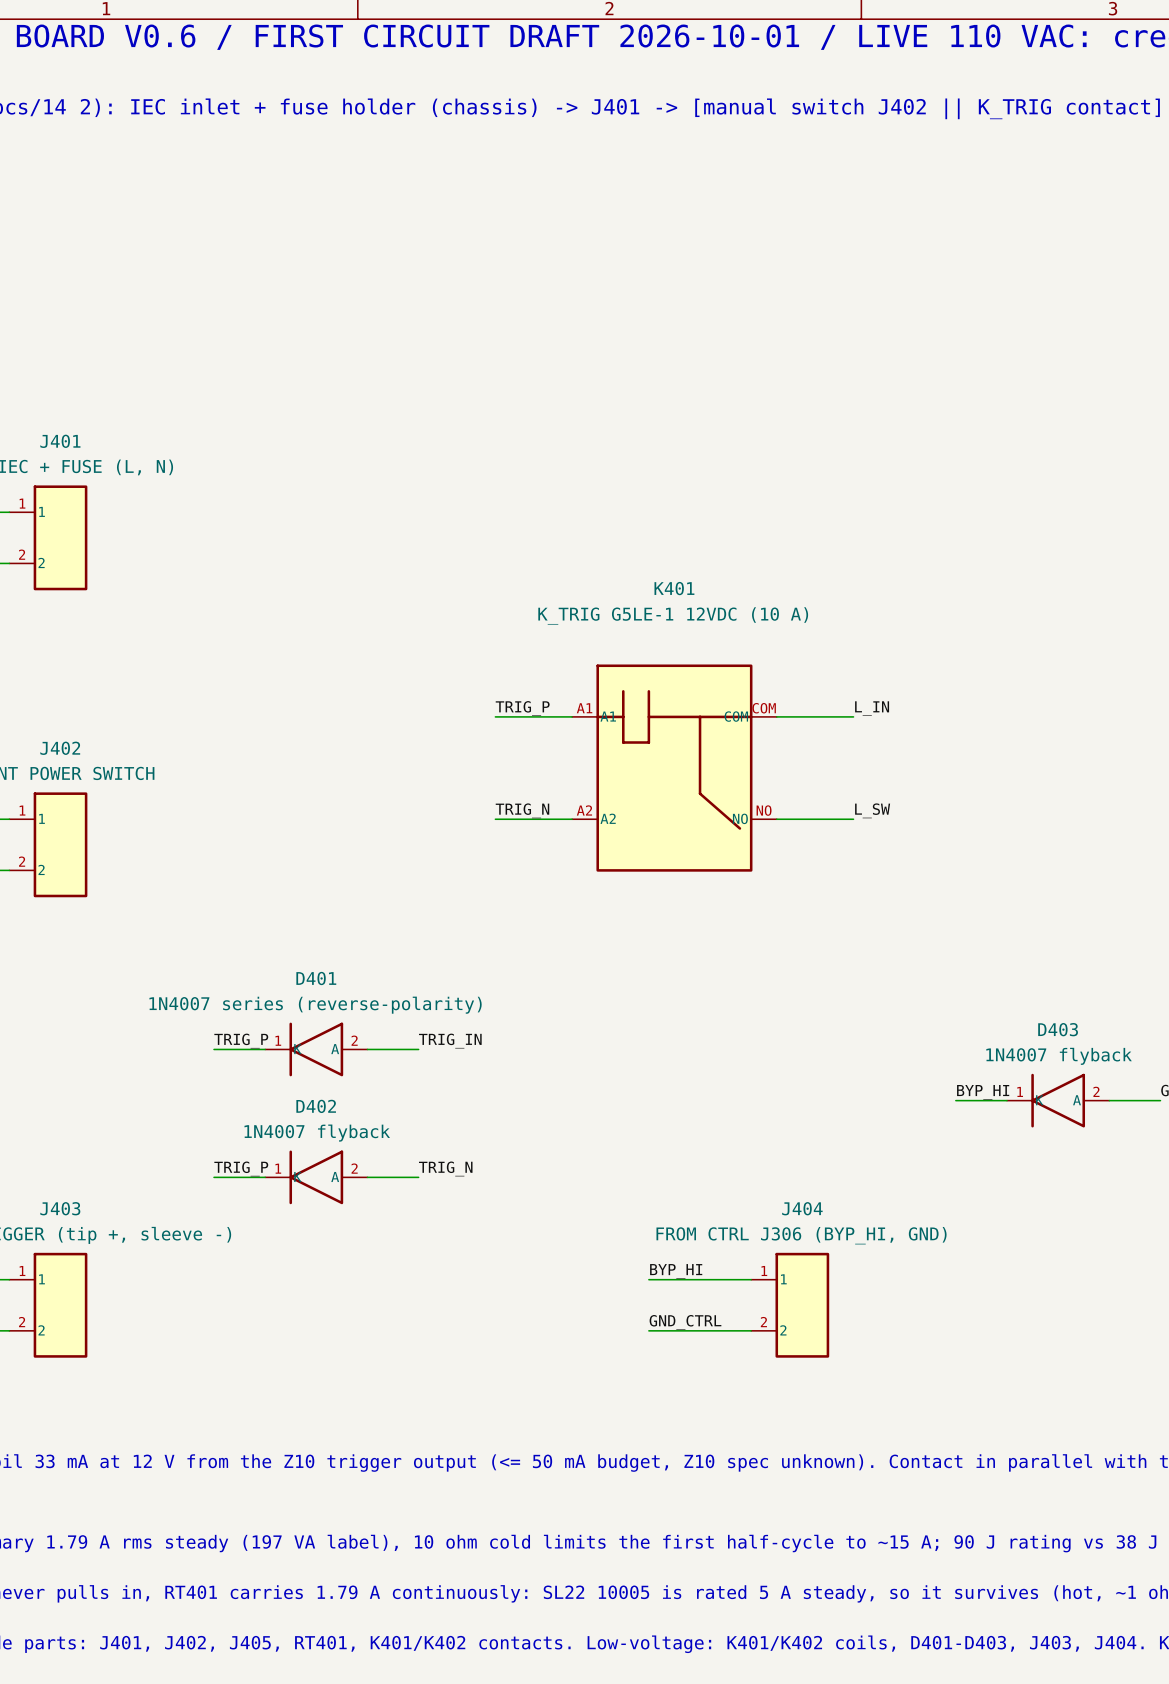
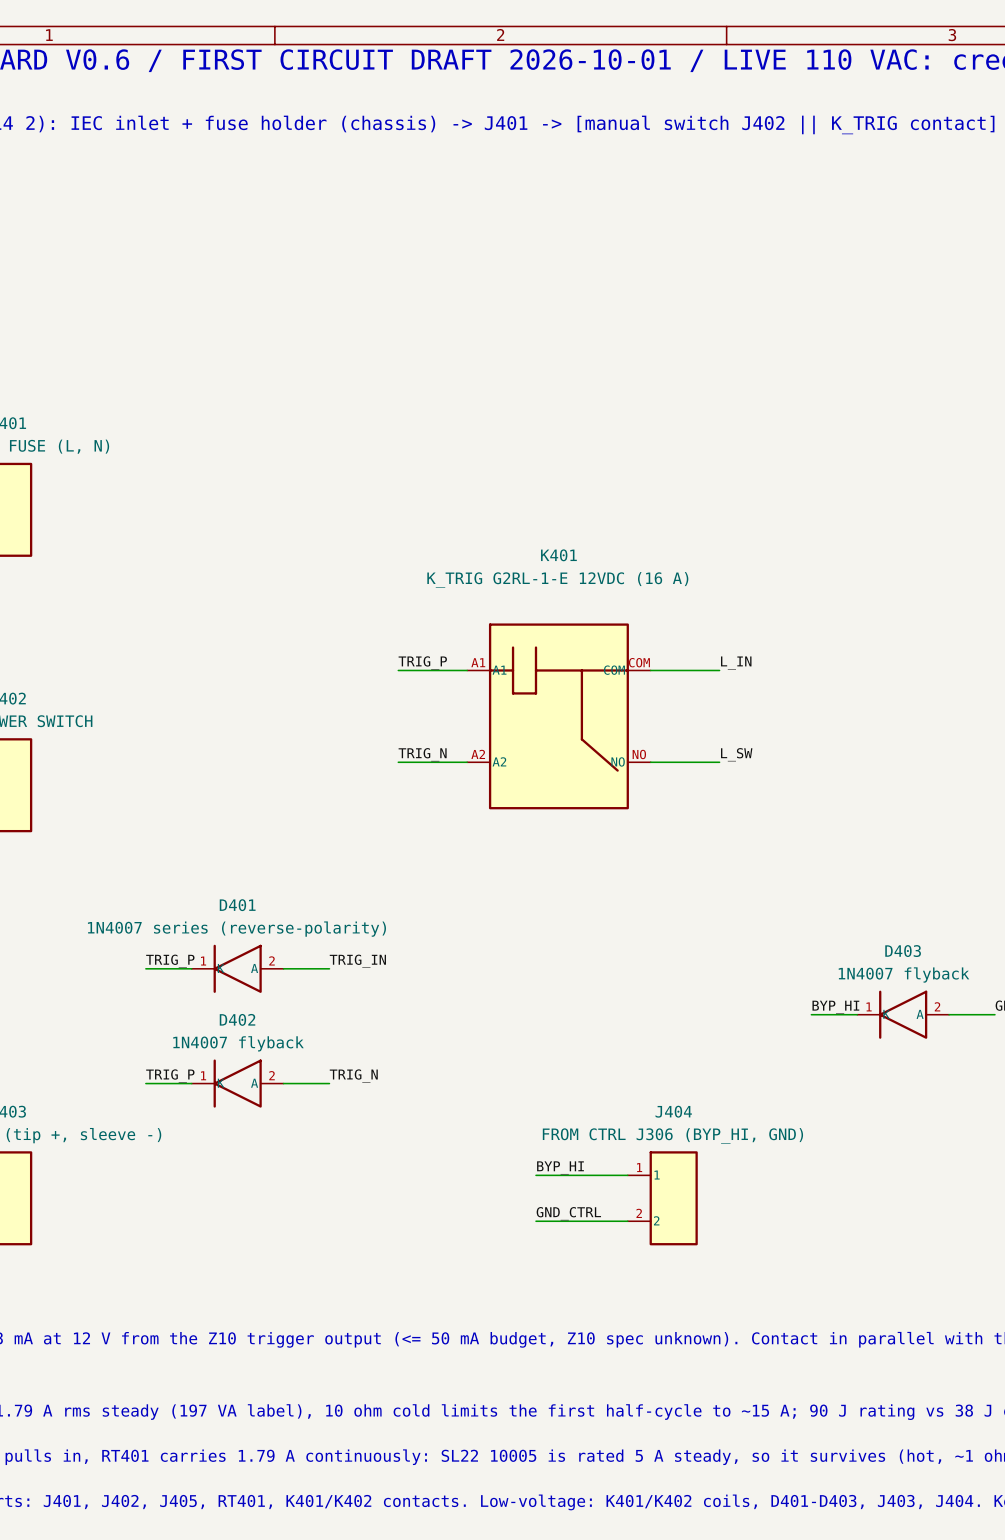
K401 value: K_TRIG G5LE-1 12VDC (10 A) (673, 615) -> K_TRIG G2RL-1-E 12VDC (16 A) (557, 579)

